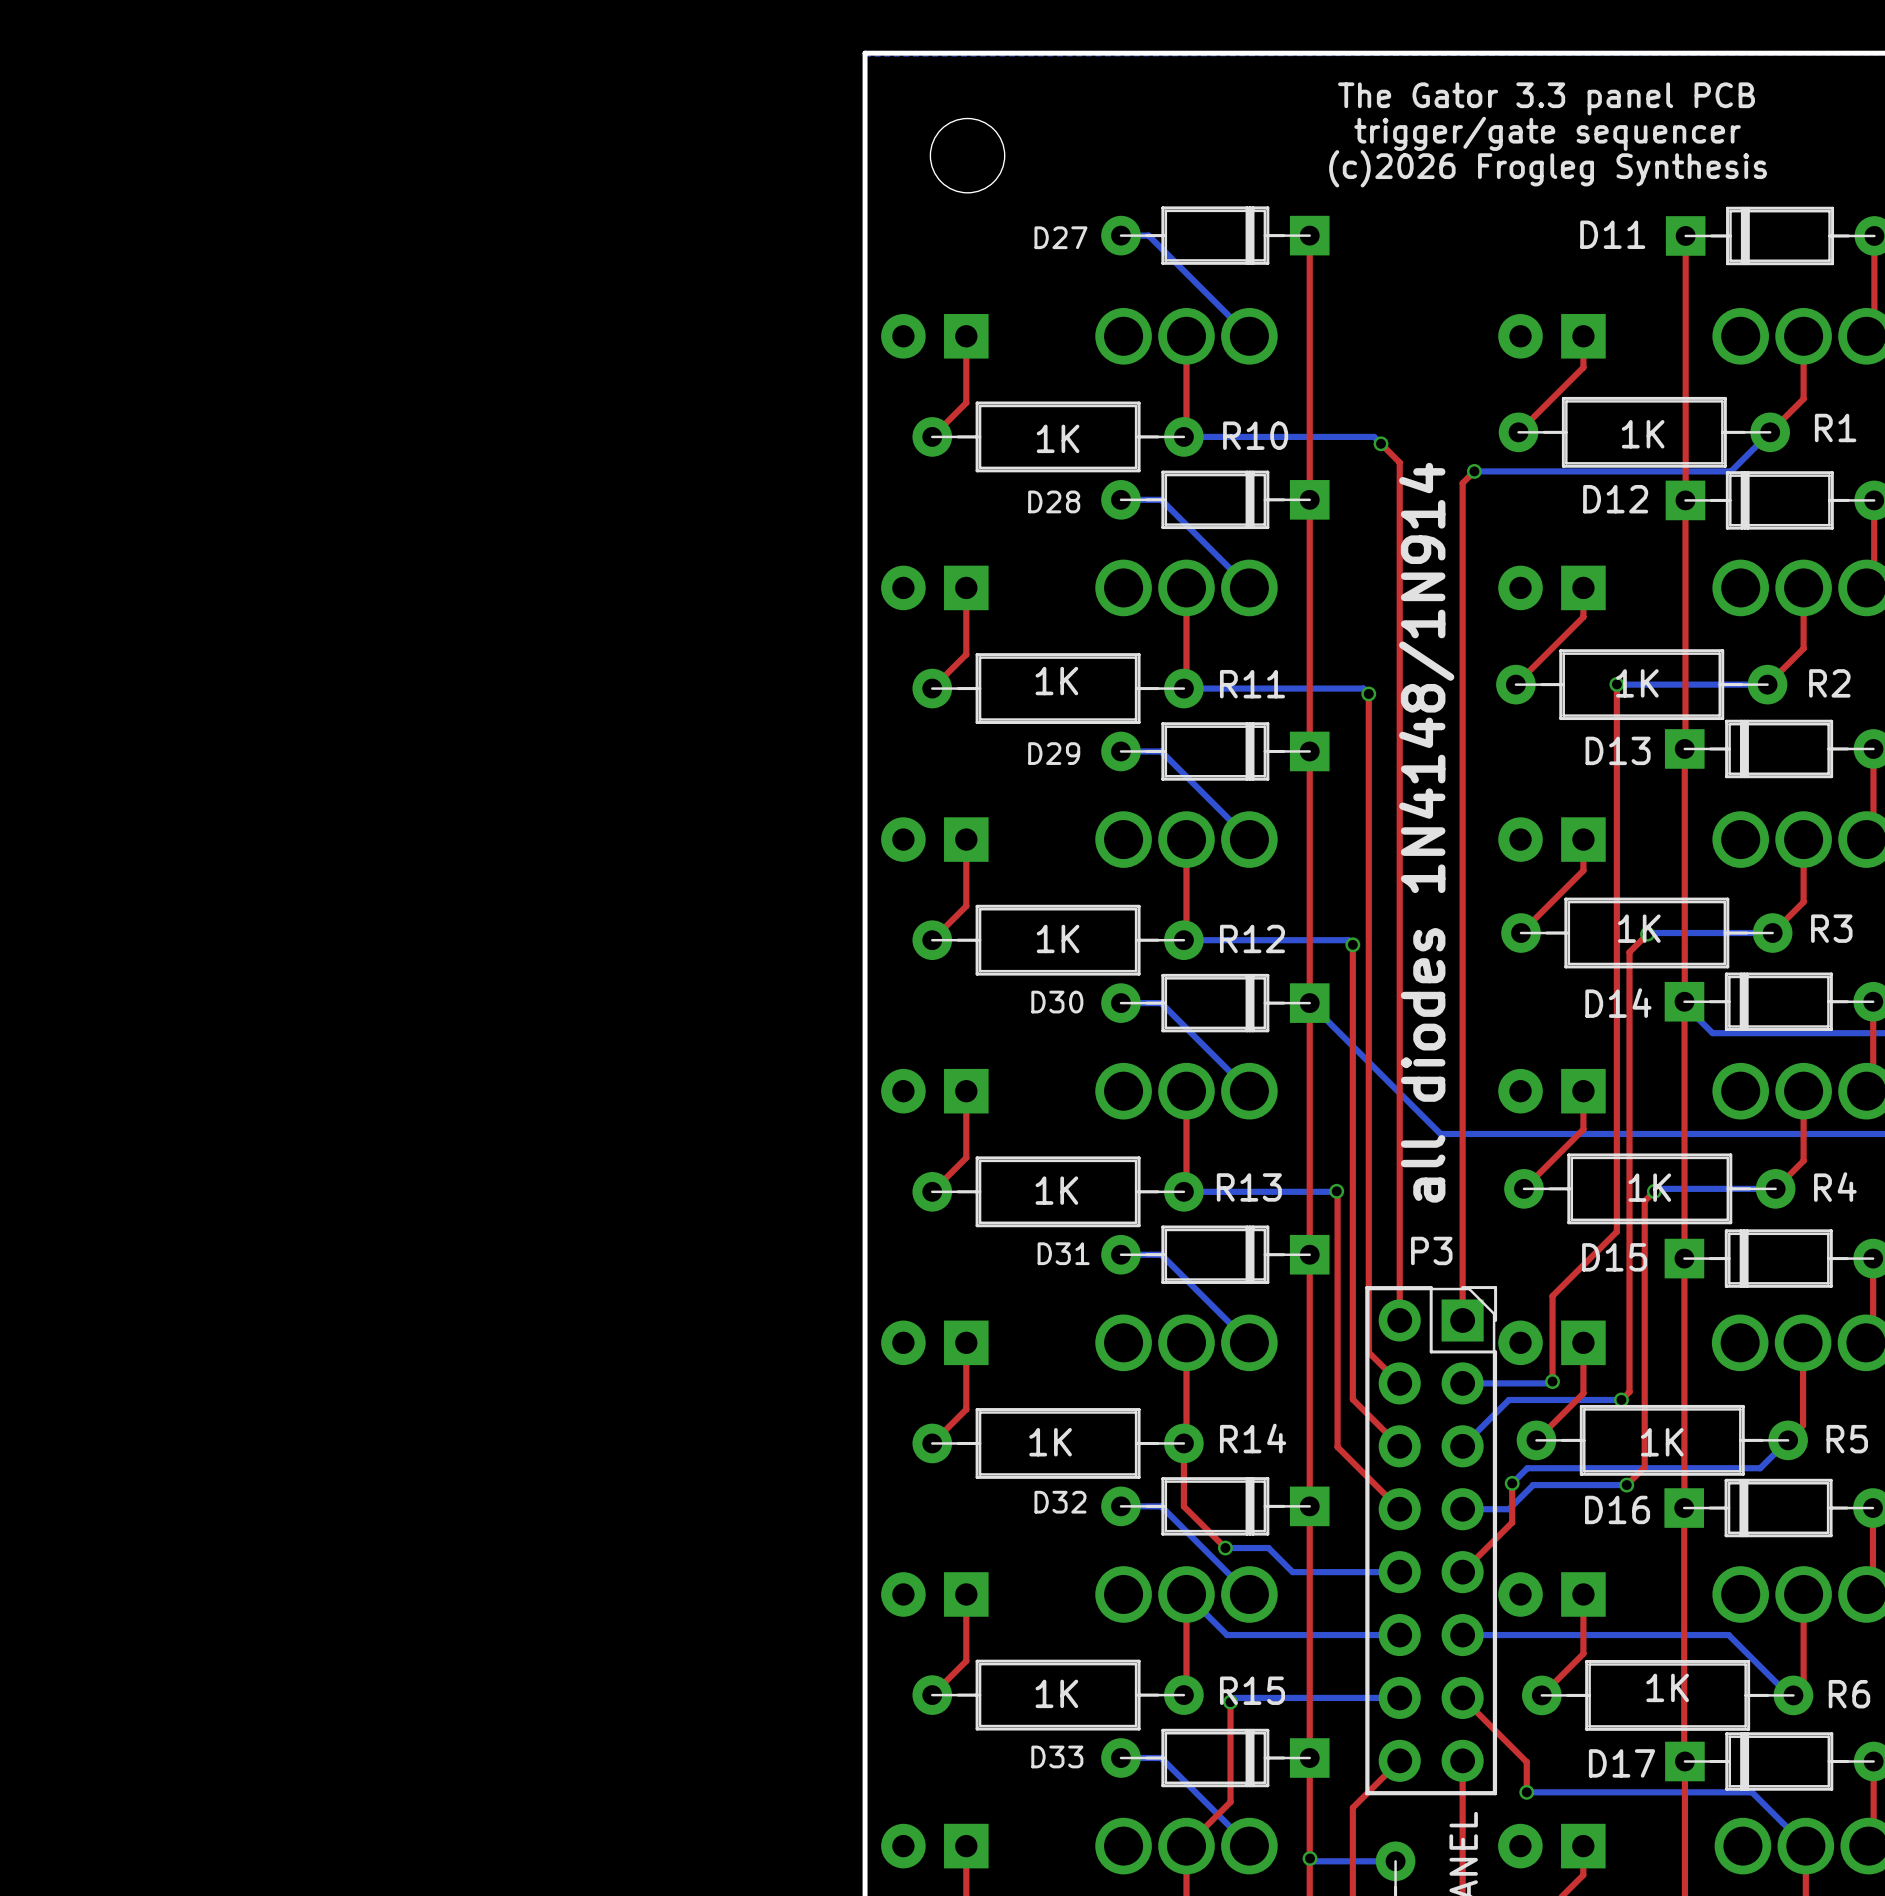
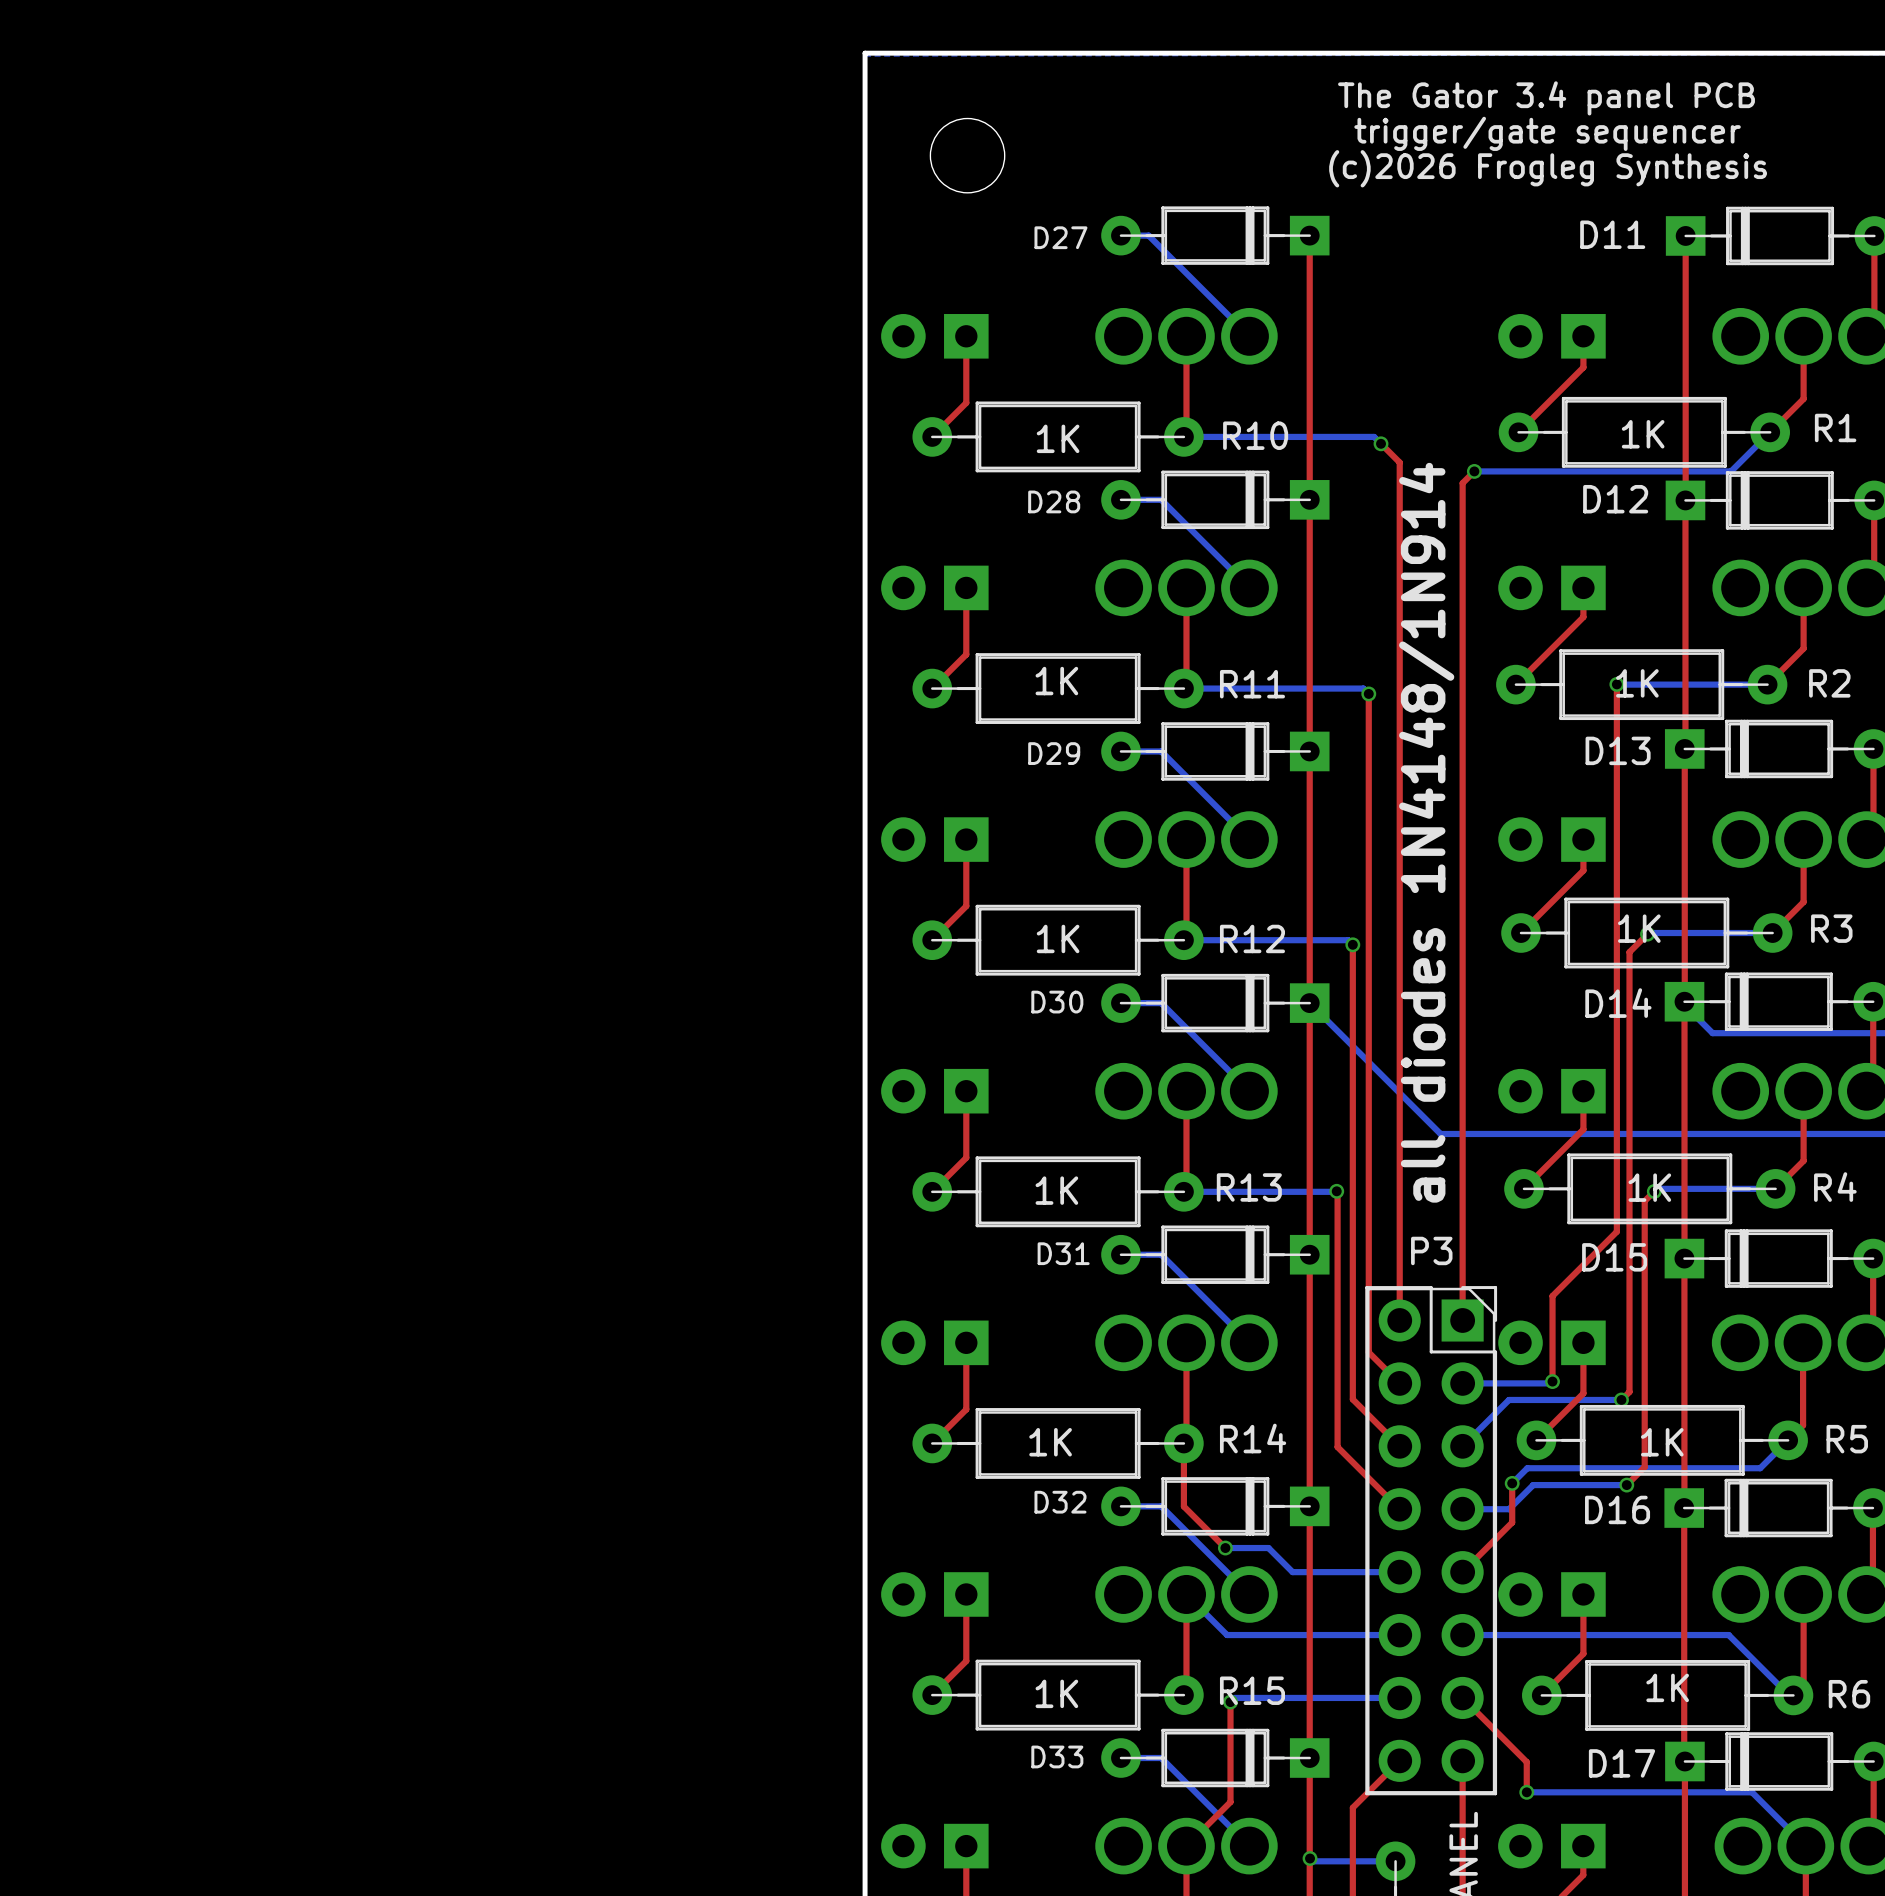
text: The Gator 3.3 panel PCB (1546, 98) -> The Gator 3.4 panel PCB (1546, 98)

